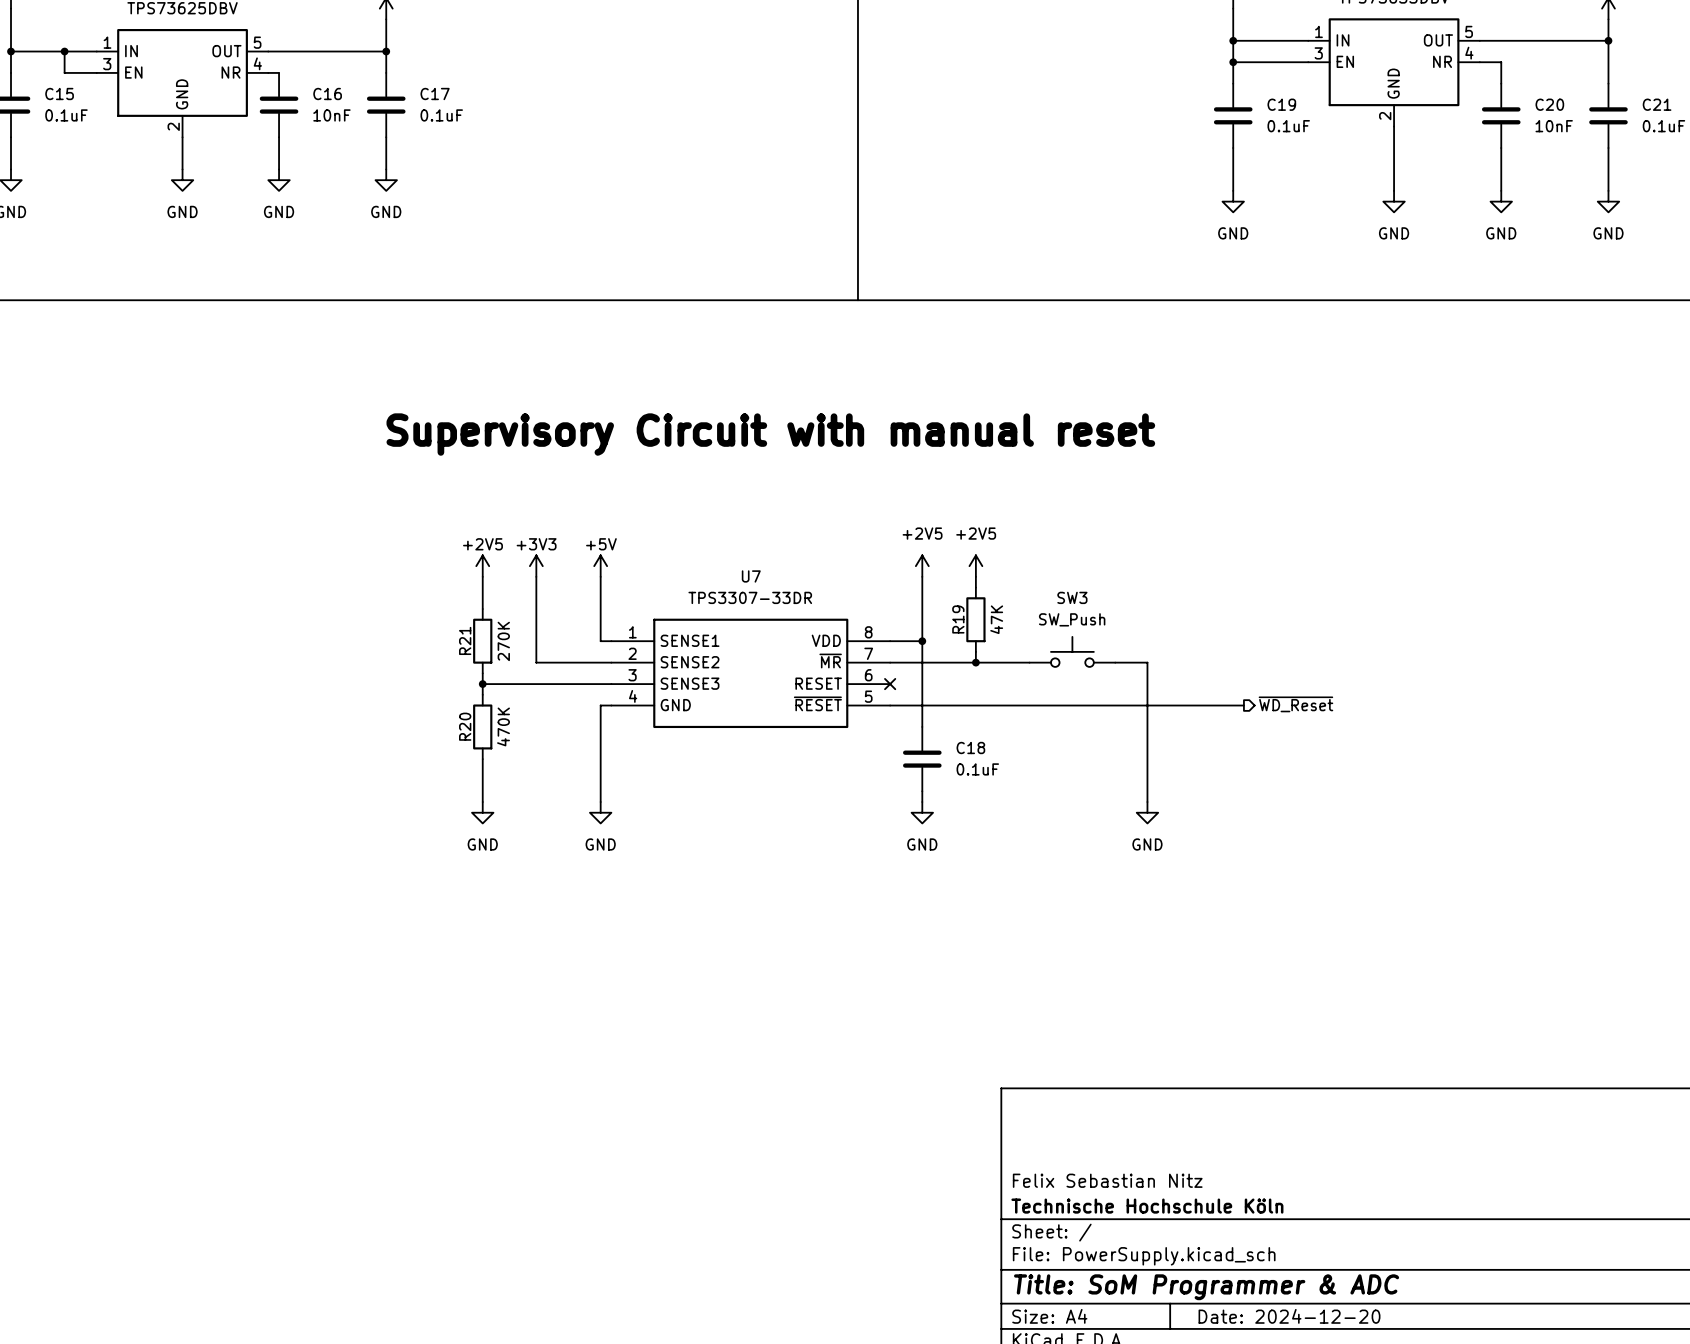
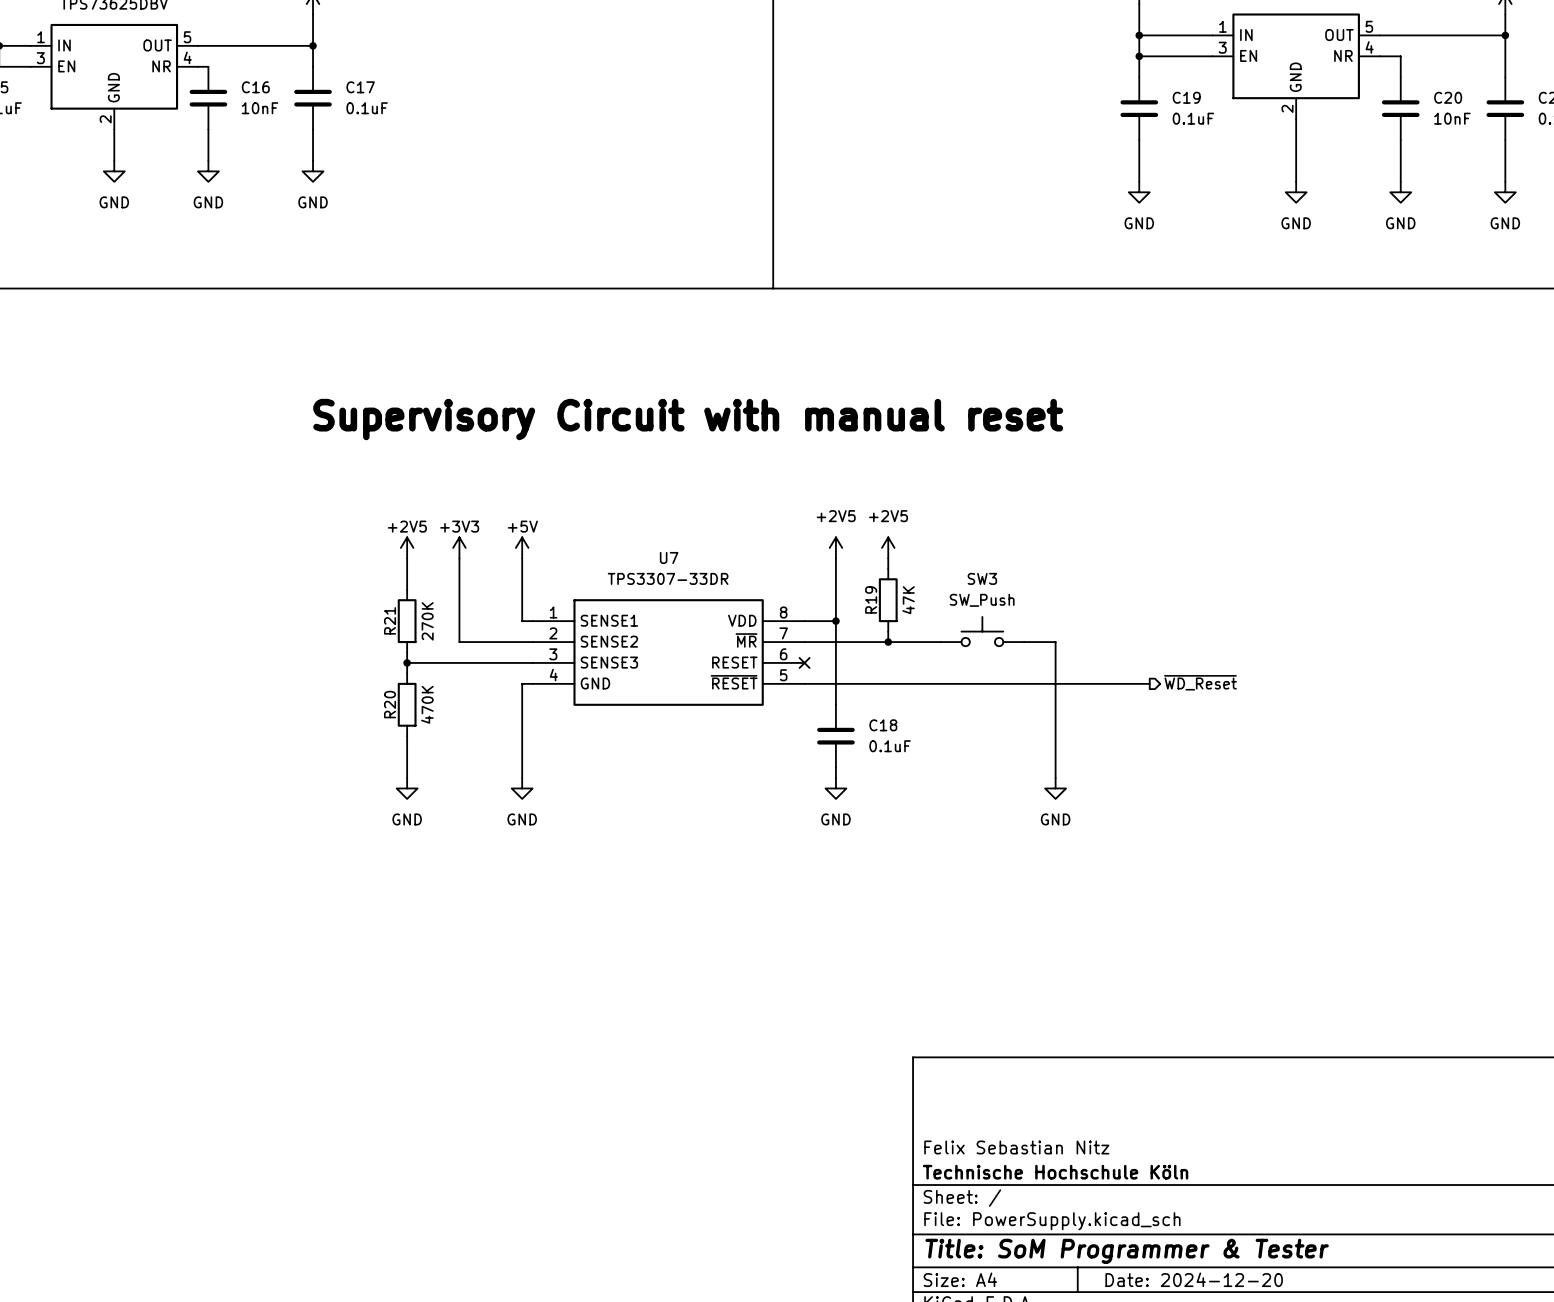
title block: Title: SoM Programmer & ADC (1206, 1287) -> Title: SoM Programmer & Tester (1127, 1251)

